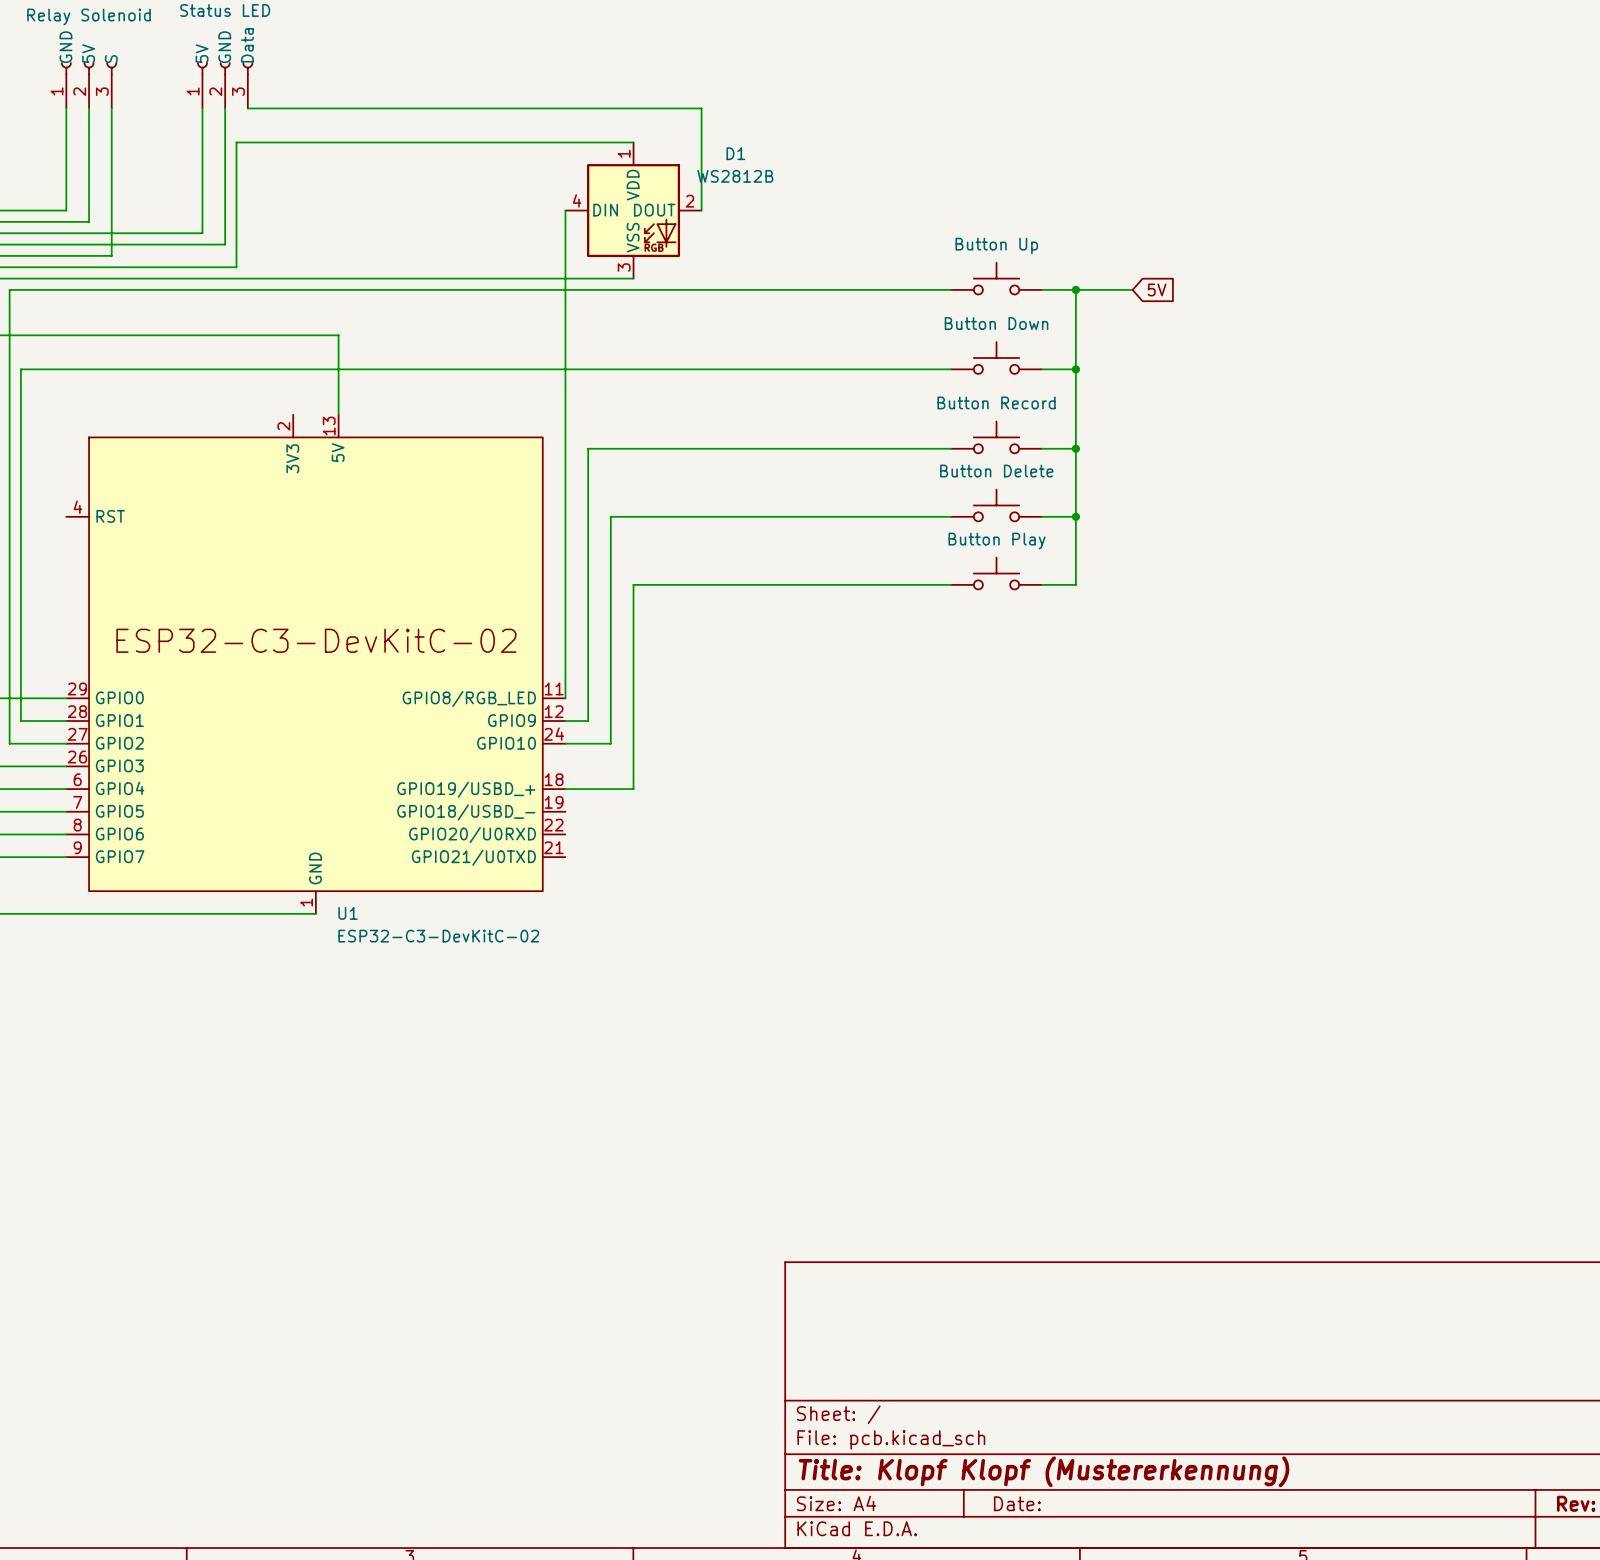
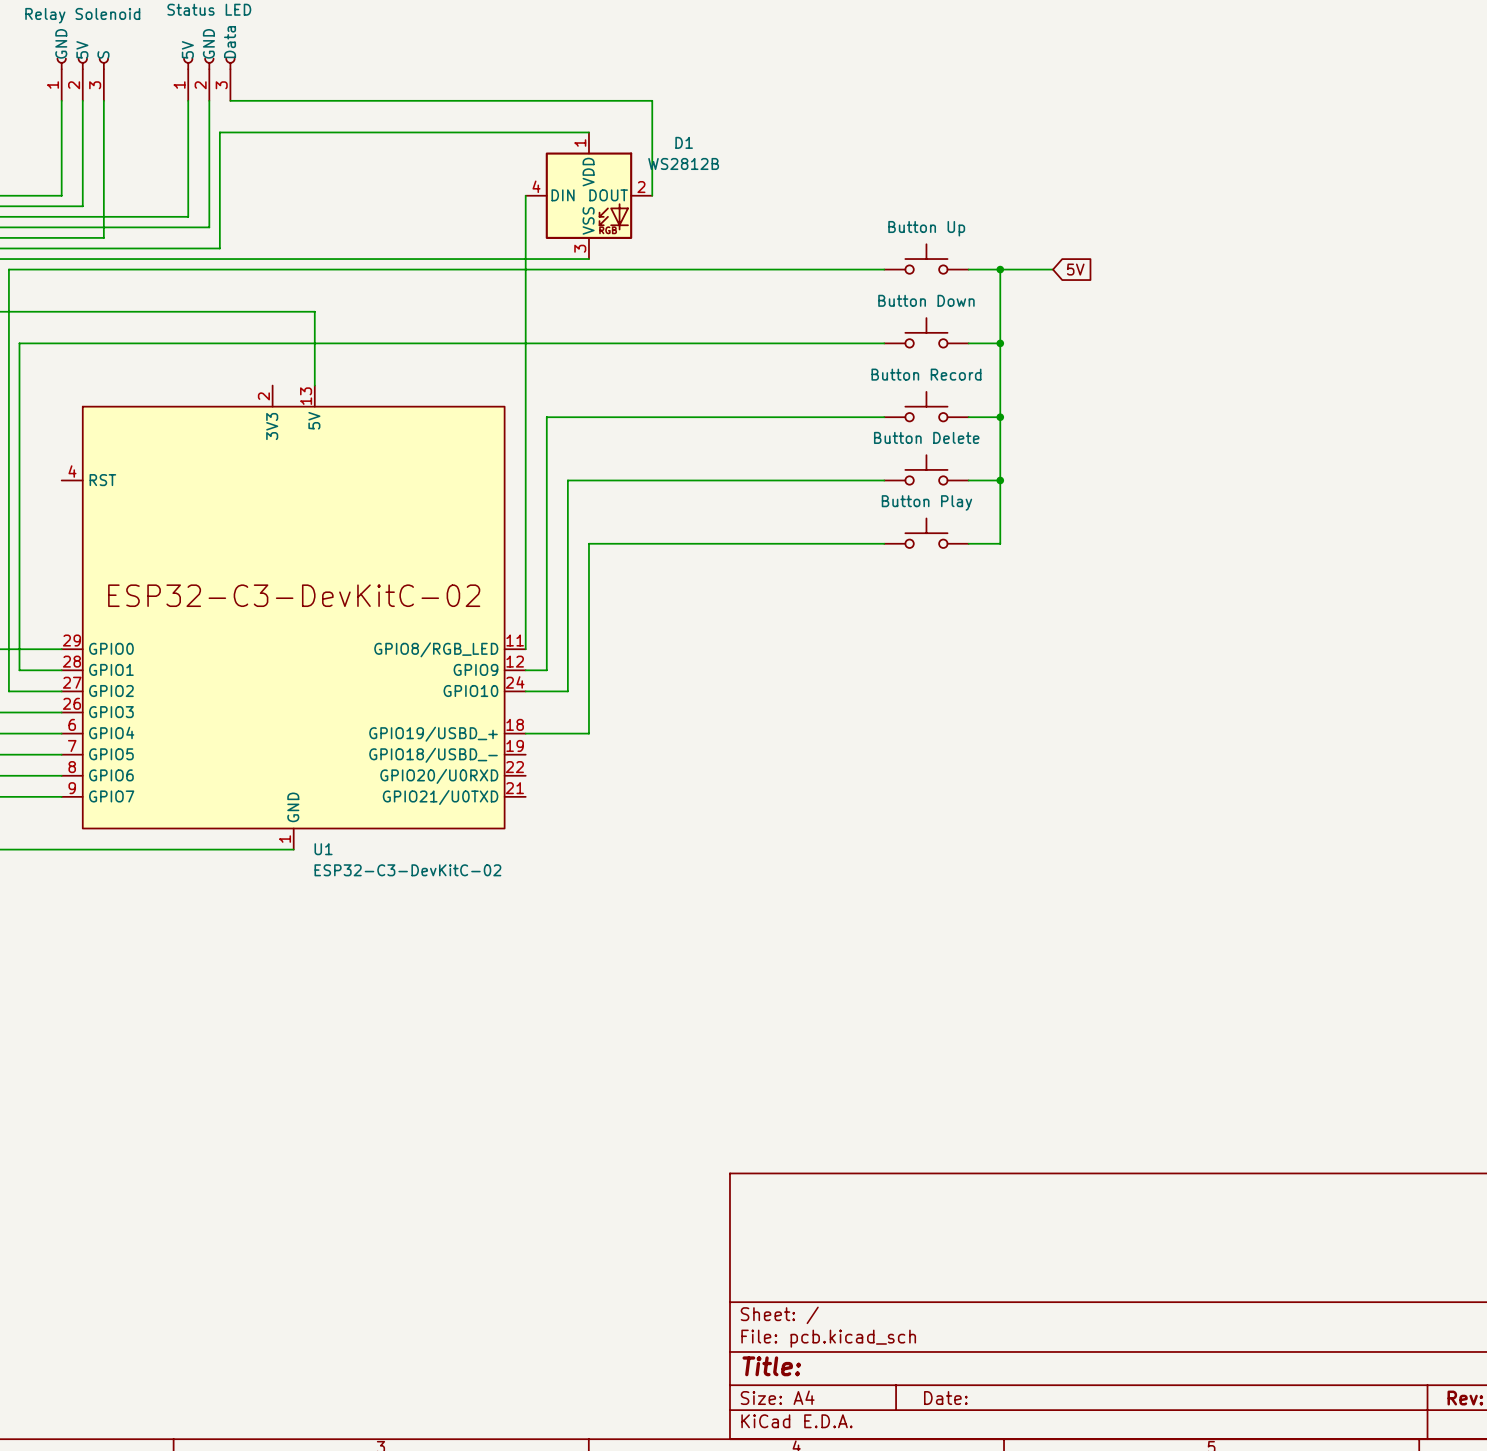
title block: Title: Klopf Klopf (Mustererkennung) (1043, 1471) -> Title: (771, 1366)

